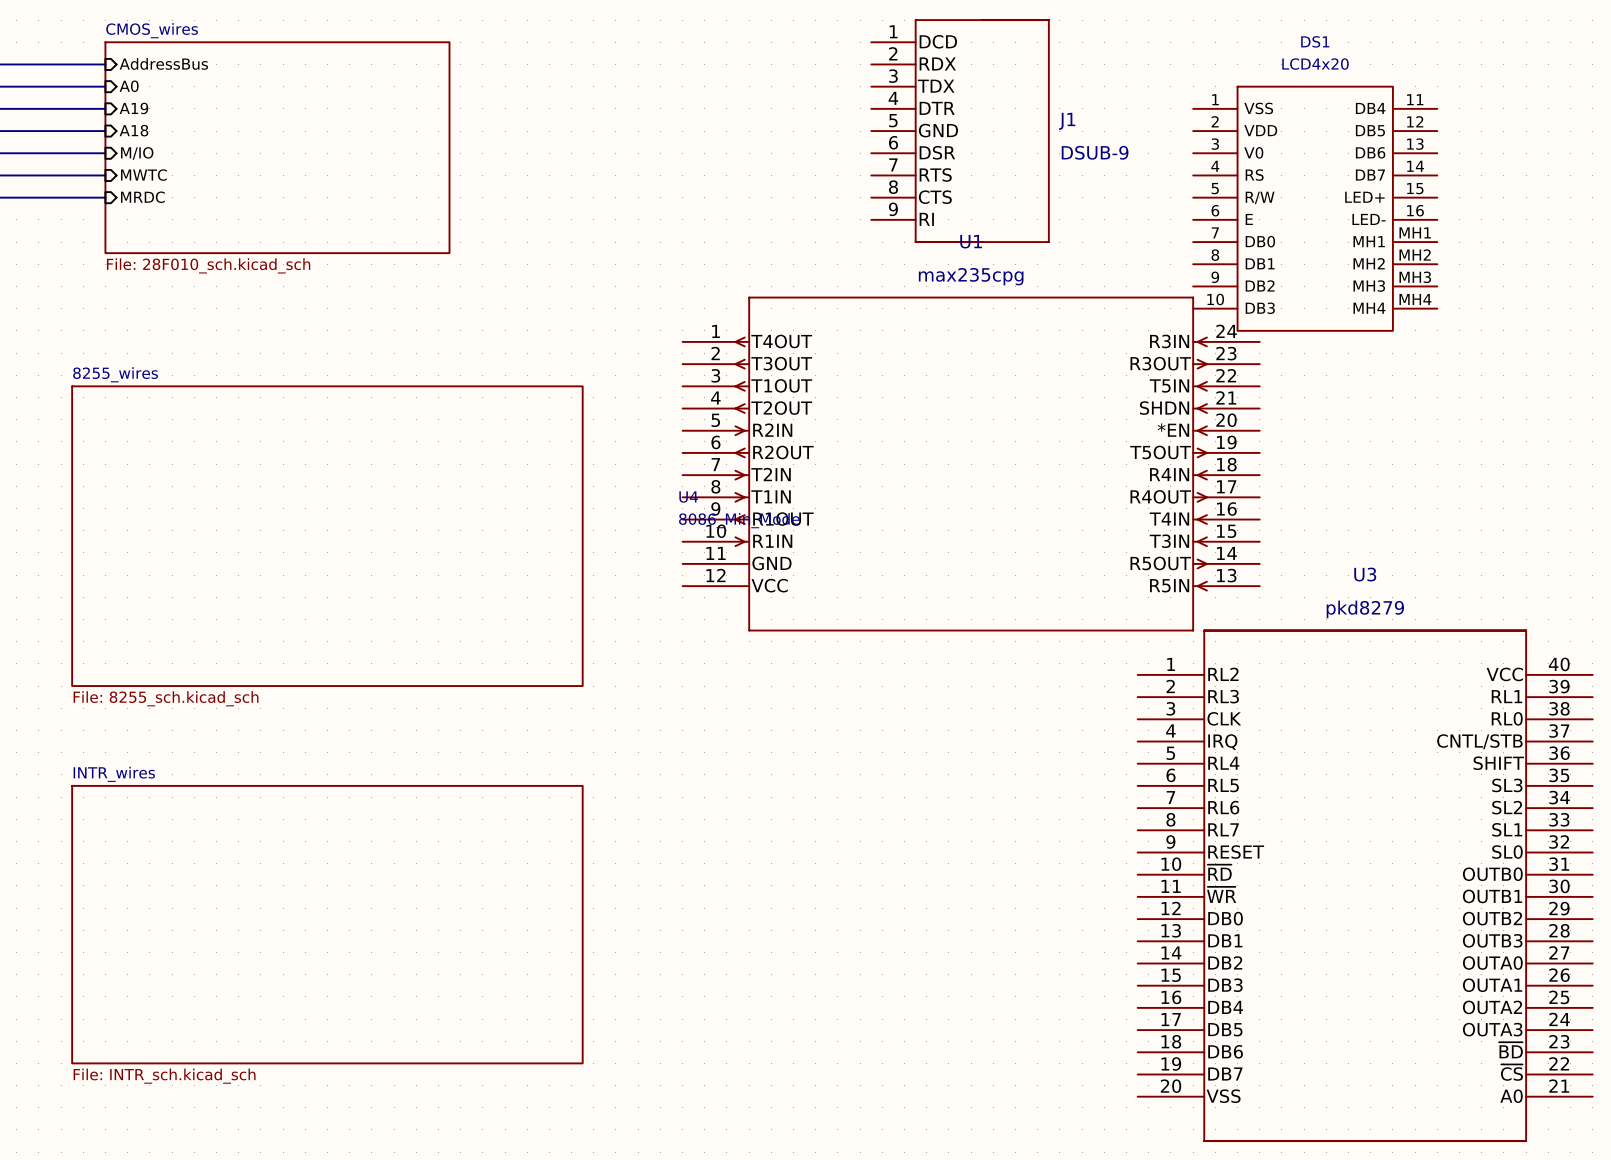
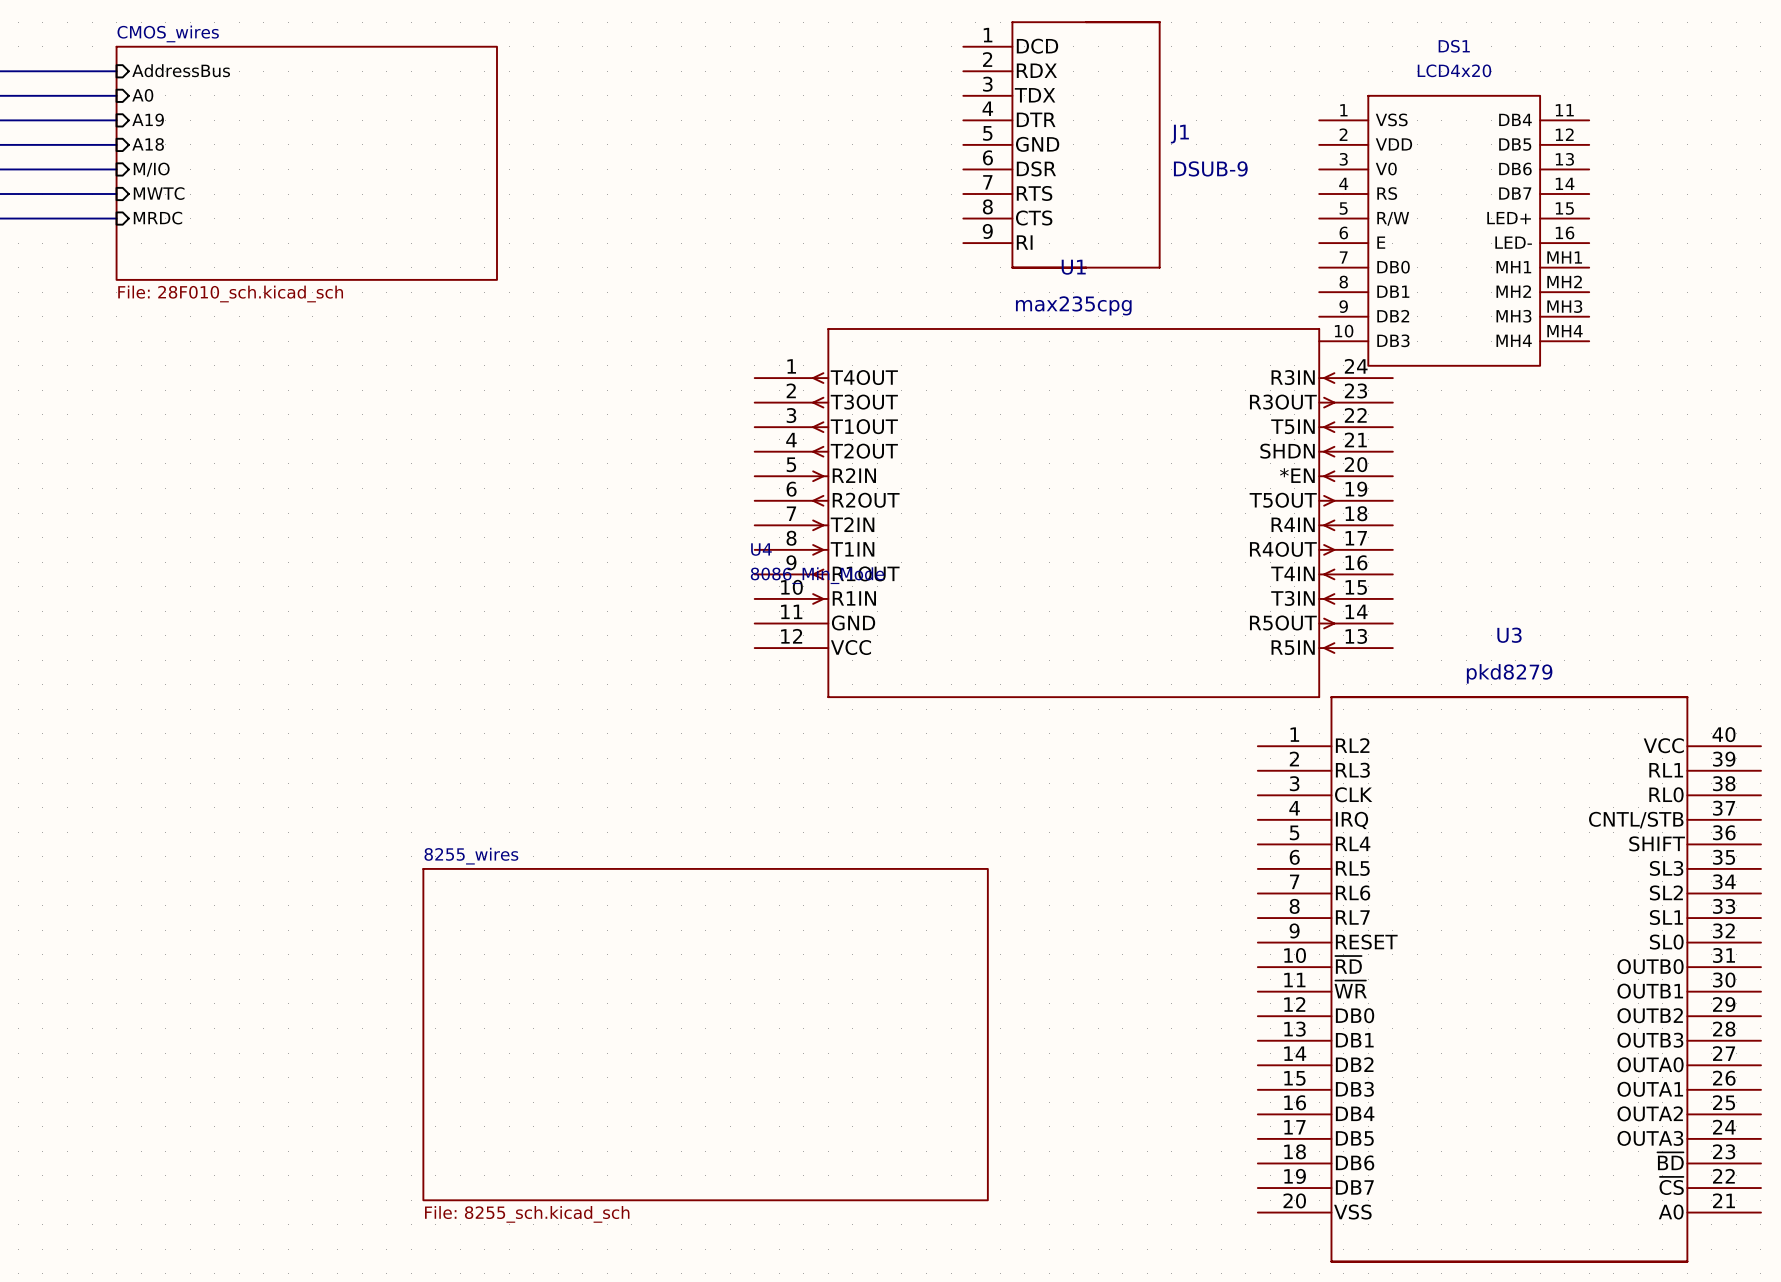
sheet 8255_wires position: (327, 536) -> (705, 1034)
sheet INTR_wires: File: INTR_sch.kicad_sch (327, 924) -> none

